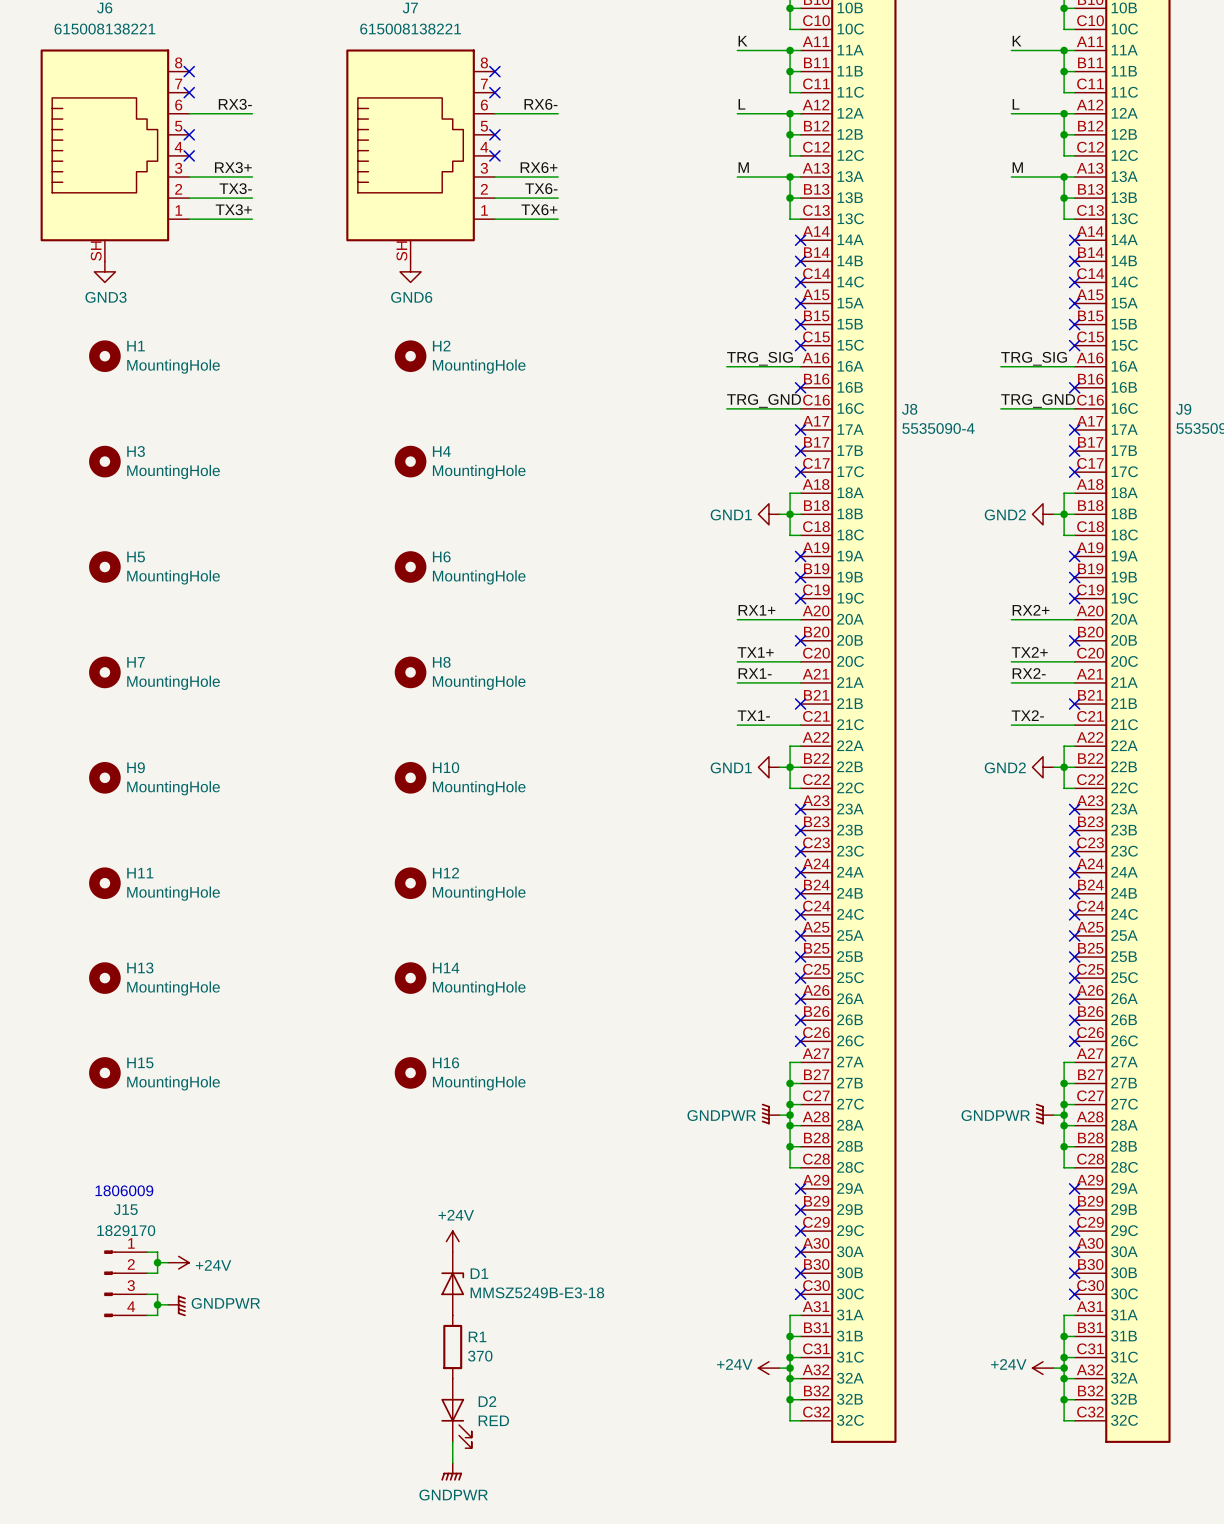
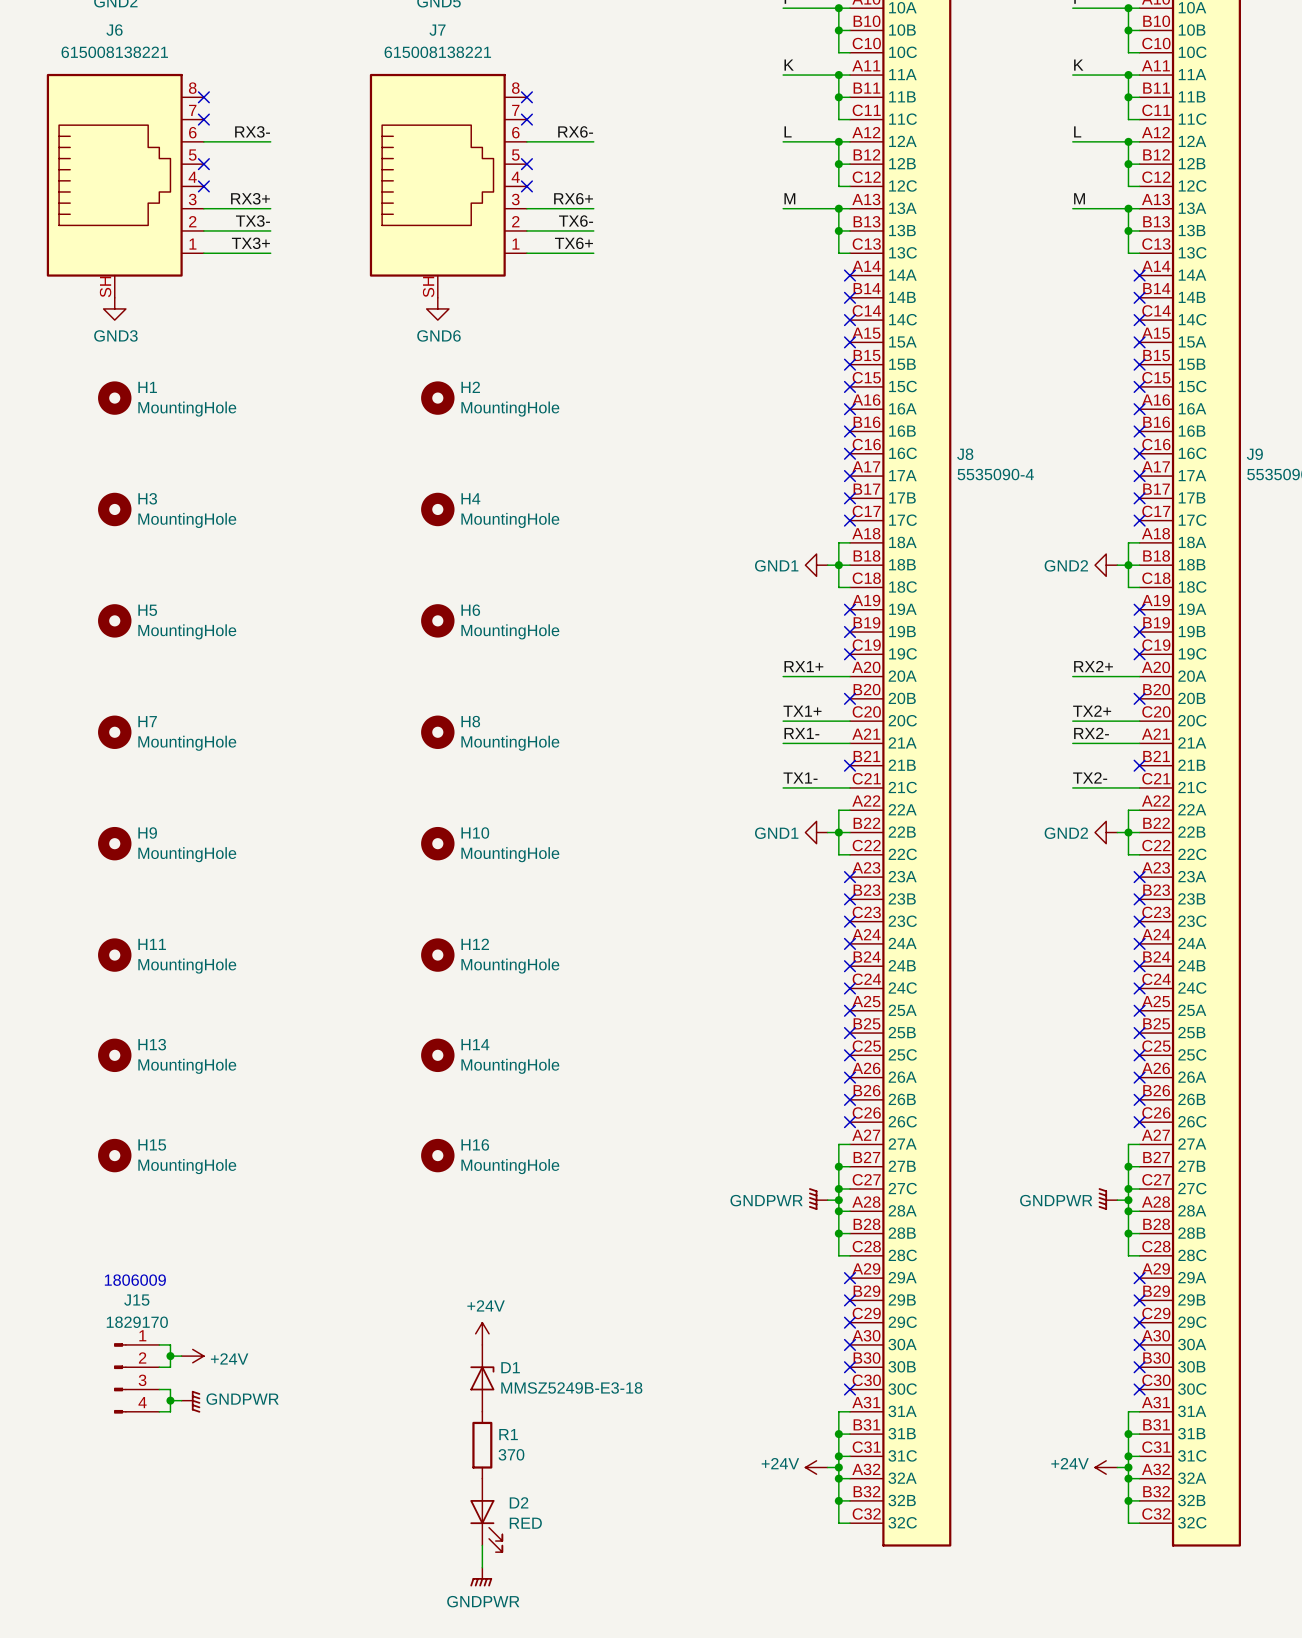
label: TRG_SIG (760, 358) -> none
label: TRG_SIG (1034, 358) -> none
wire: (726, 366) (800, 366) -> none
no-connect mark: none -> (849, 409)
wire: (1000, 366) (1074, 366) -> none
no-connect mark: none -> (1139, 409)
label: TRG_GND (764, 400) -> none
label: TRG_GND (1038, 400) -> none
wire: (726, 408) (800, 408) -> none
no-connect mark: none -> (849, 453)
wire: (1000, 408) (1074, 408) -> none
no-connect mark: none -> (1139, 453)

